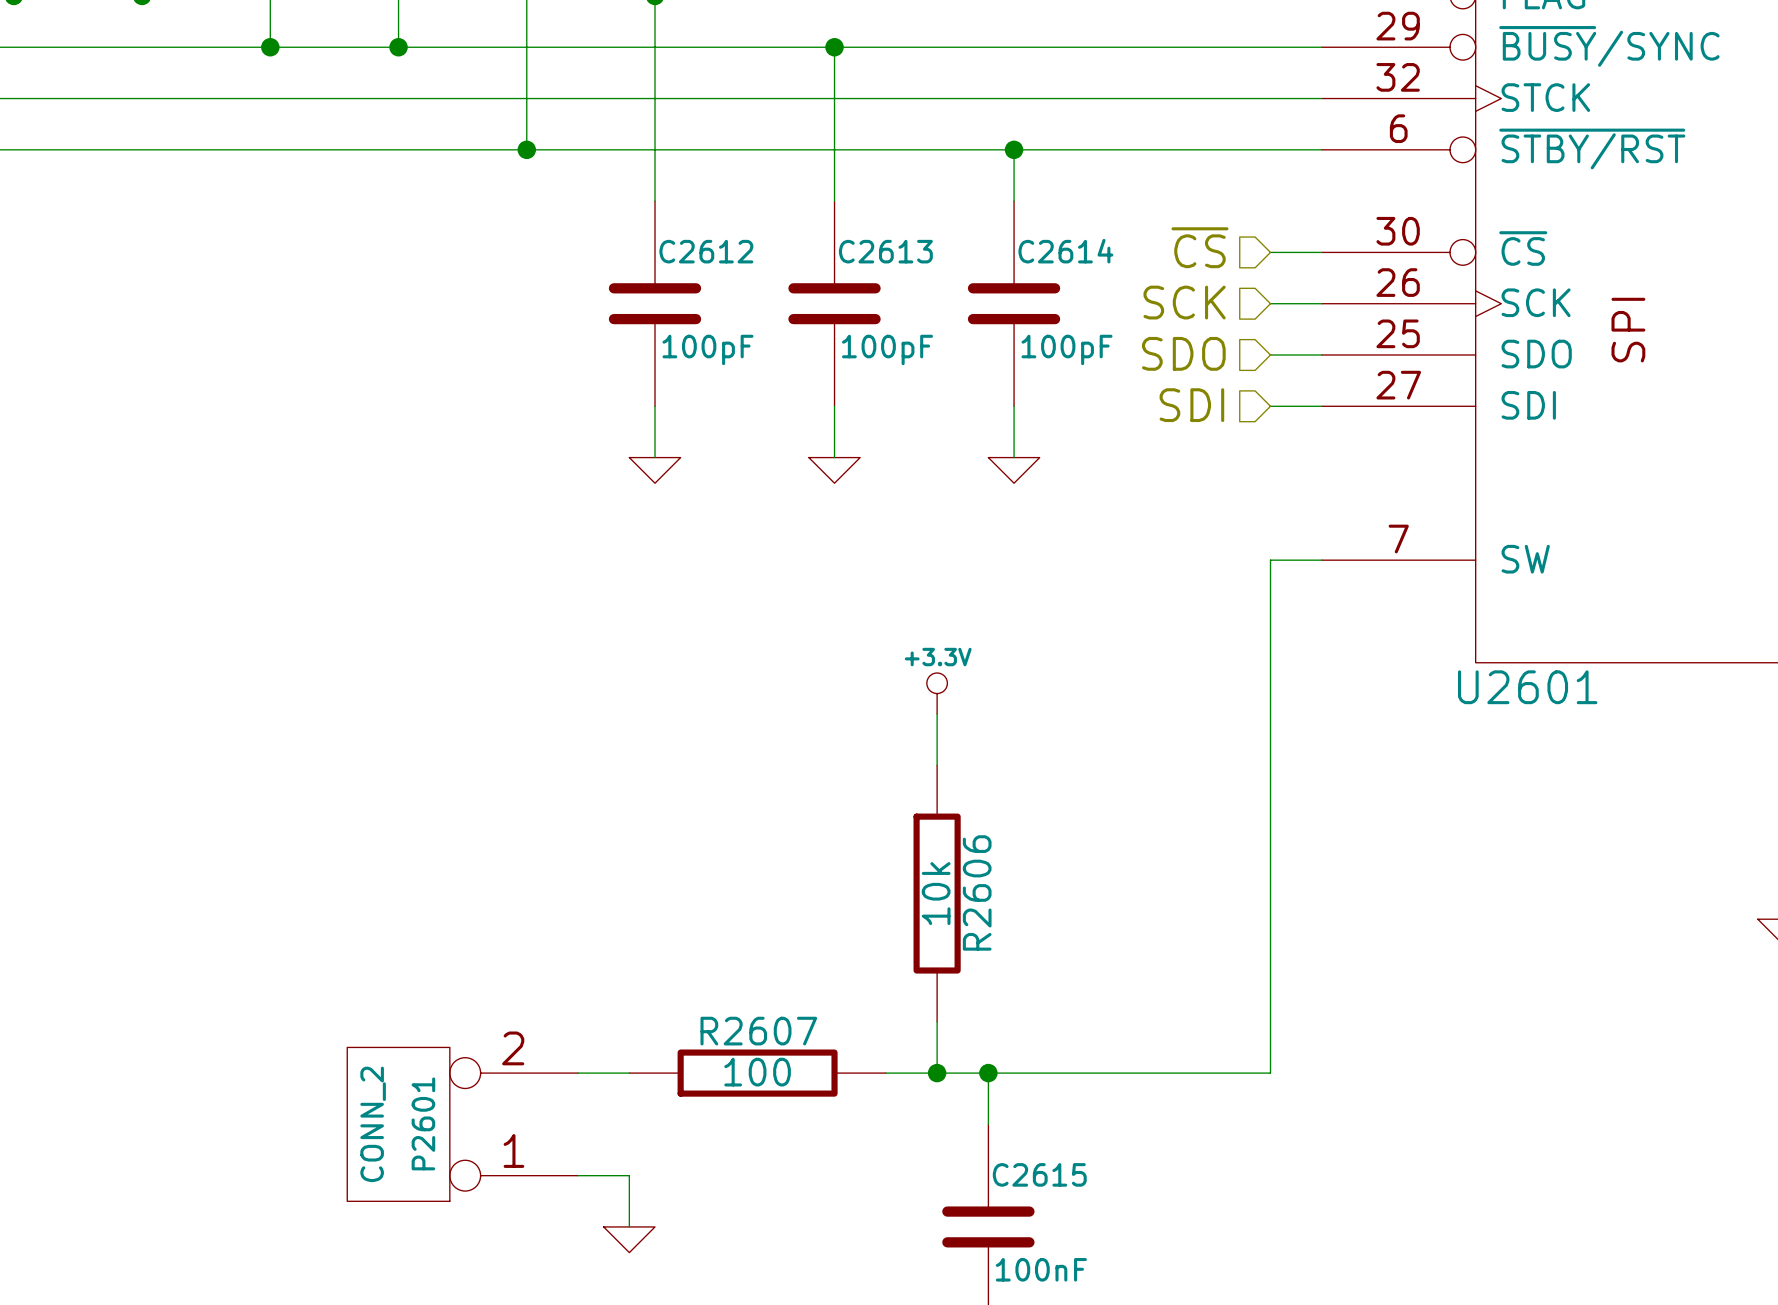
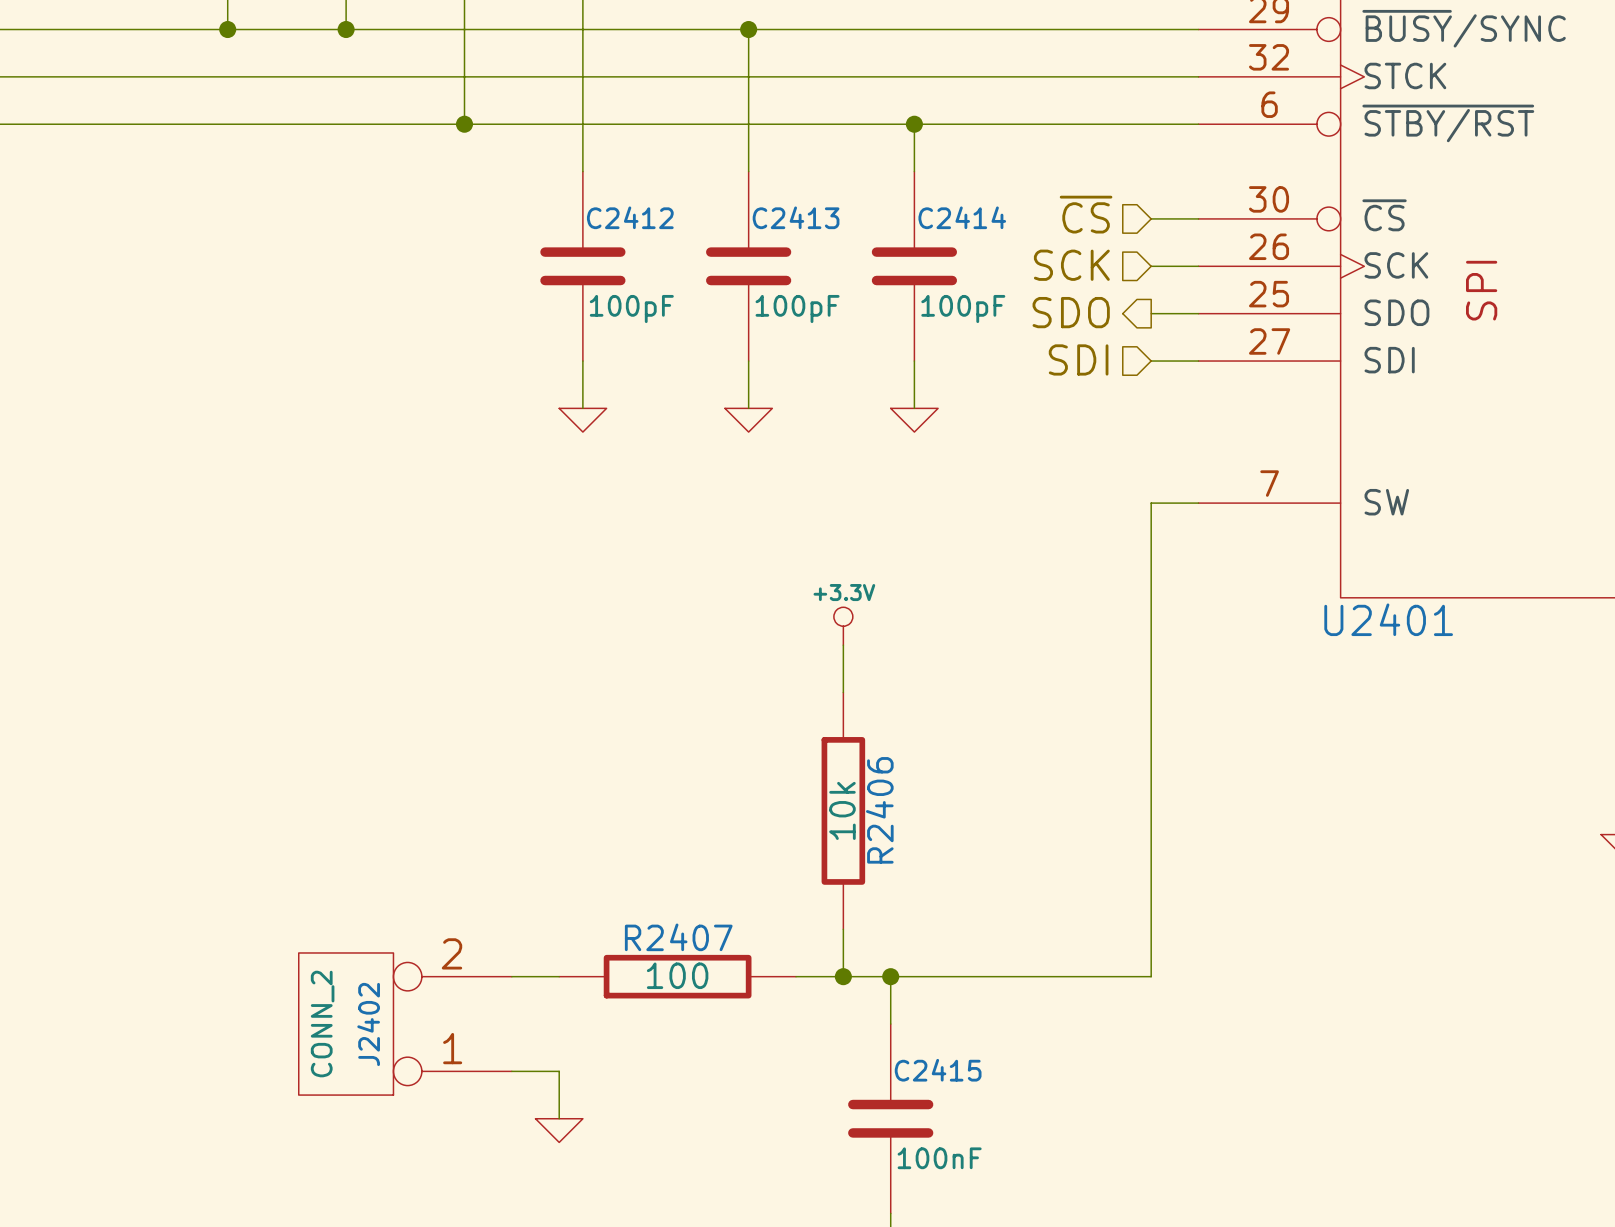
C2612 name: C2612 (706, 251) -> C2412 (630, 217)
C2613 name: C2613 (885, 251) -> C2413 (796, 217)
C2614 name: C2614 (1065, 251) -> C2414 (962, 217)
hierarchical label shape: input (1183, 353) -> output (1071, 312)
U2601 name: U2601 (1527, 687) -> U2401 (1388, 619)
R2606 name: R2606 (977, 892) -> R2406 (879, 810)
R2607 name: R2607 (758, 1031) -> R2407 (678, 937)
P2601 name: P2601 (423, 1123) -> J2402 (368, 1024)
C2615 name: C2615 (1039, 1174) -> C2415 (938, 1070)

